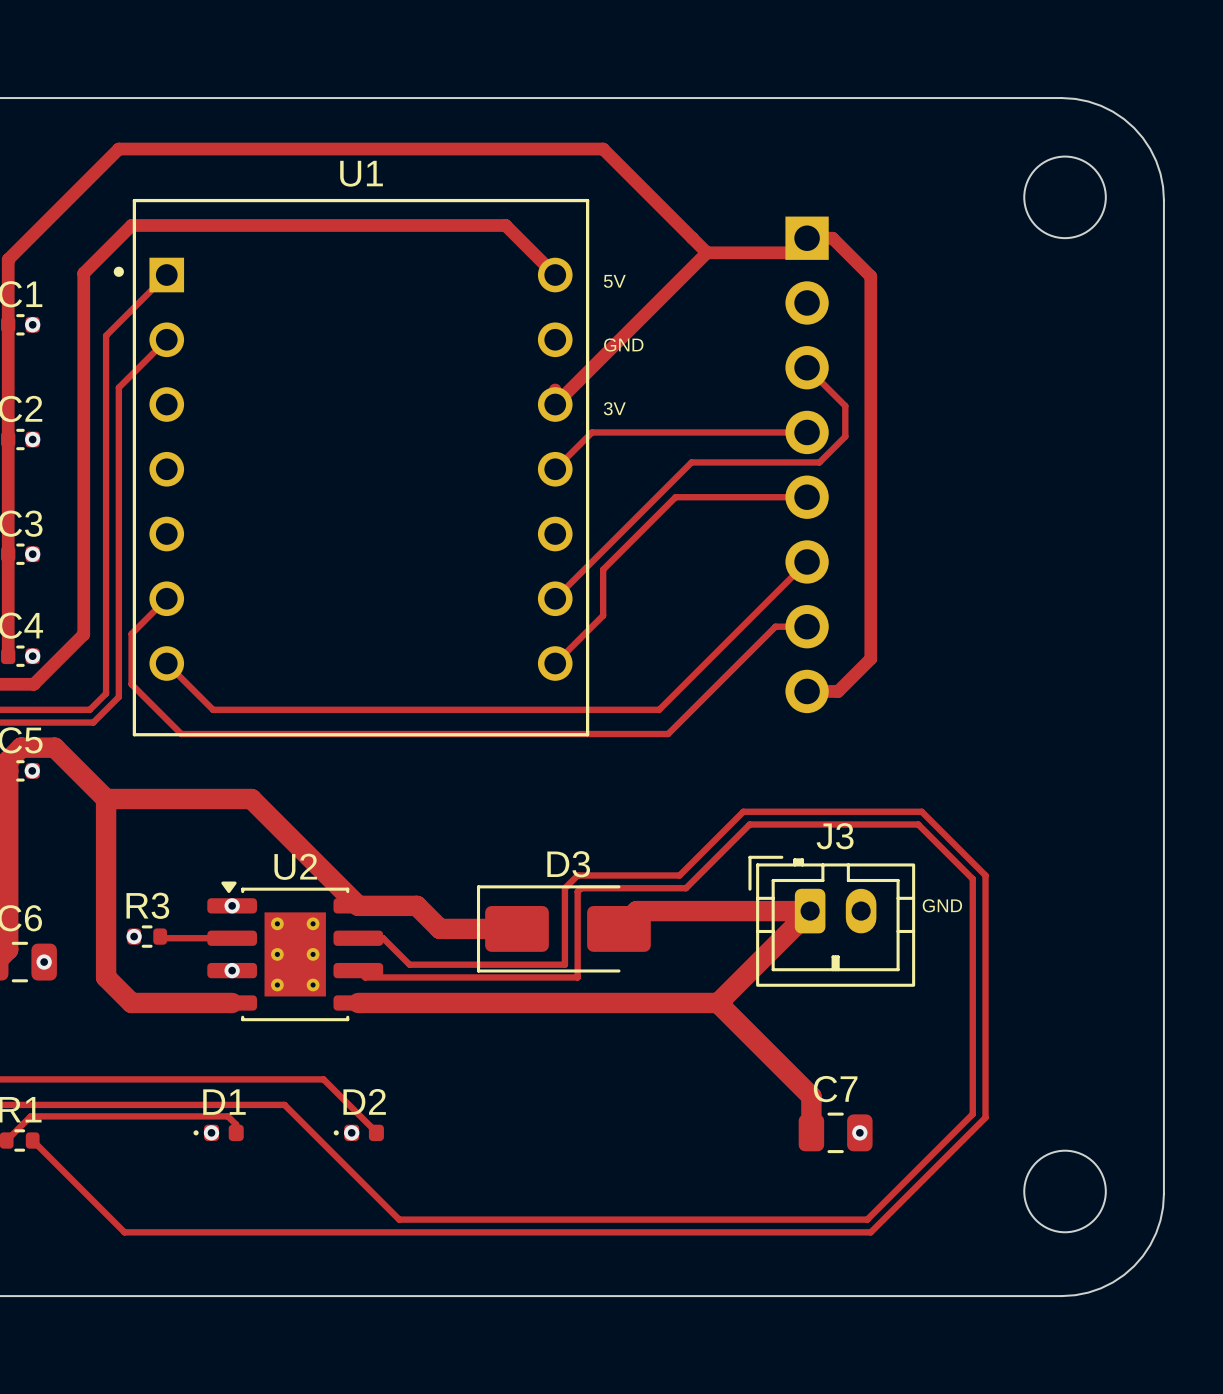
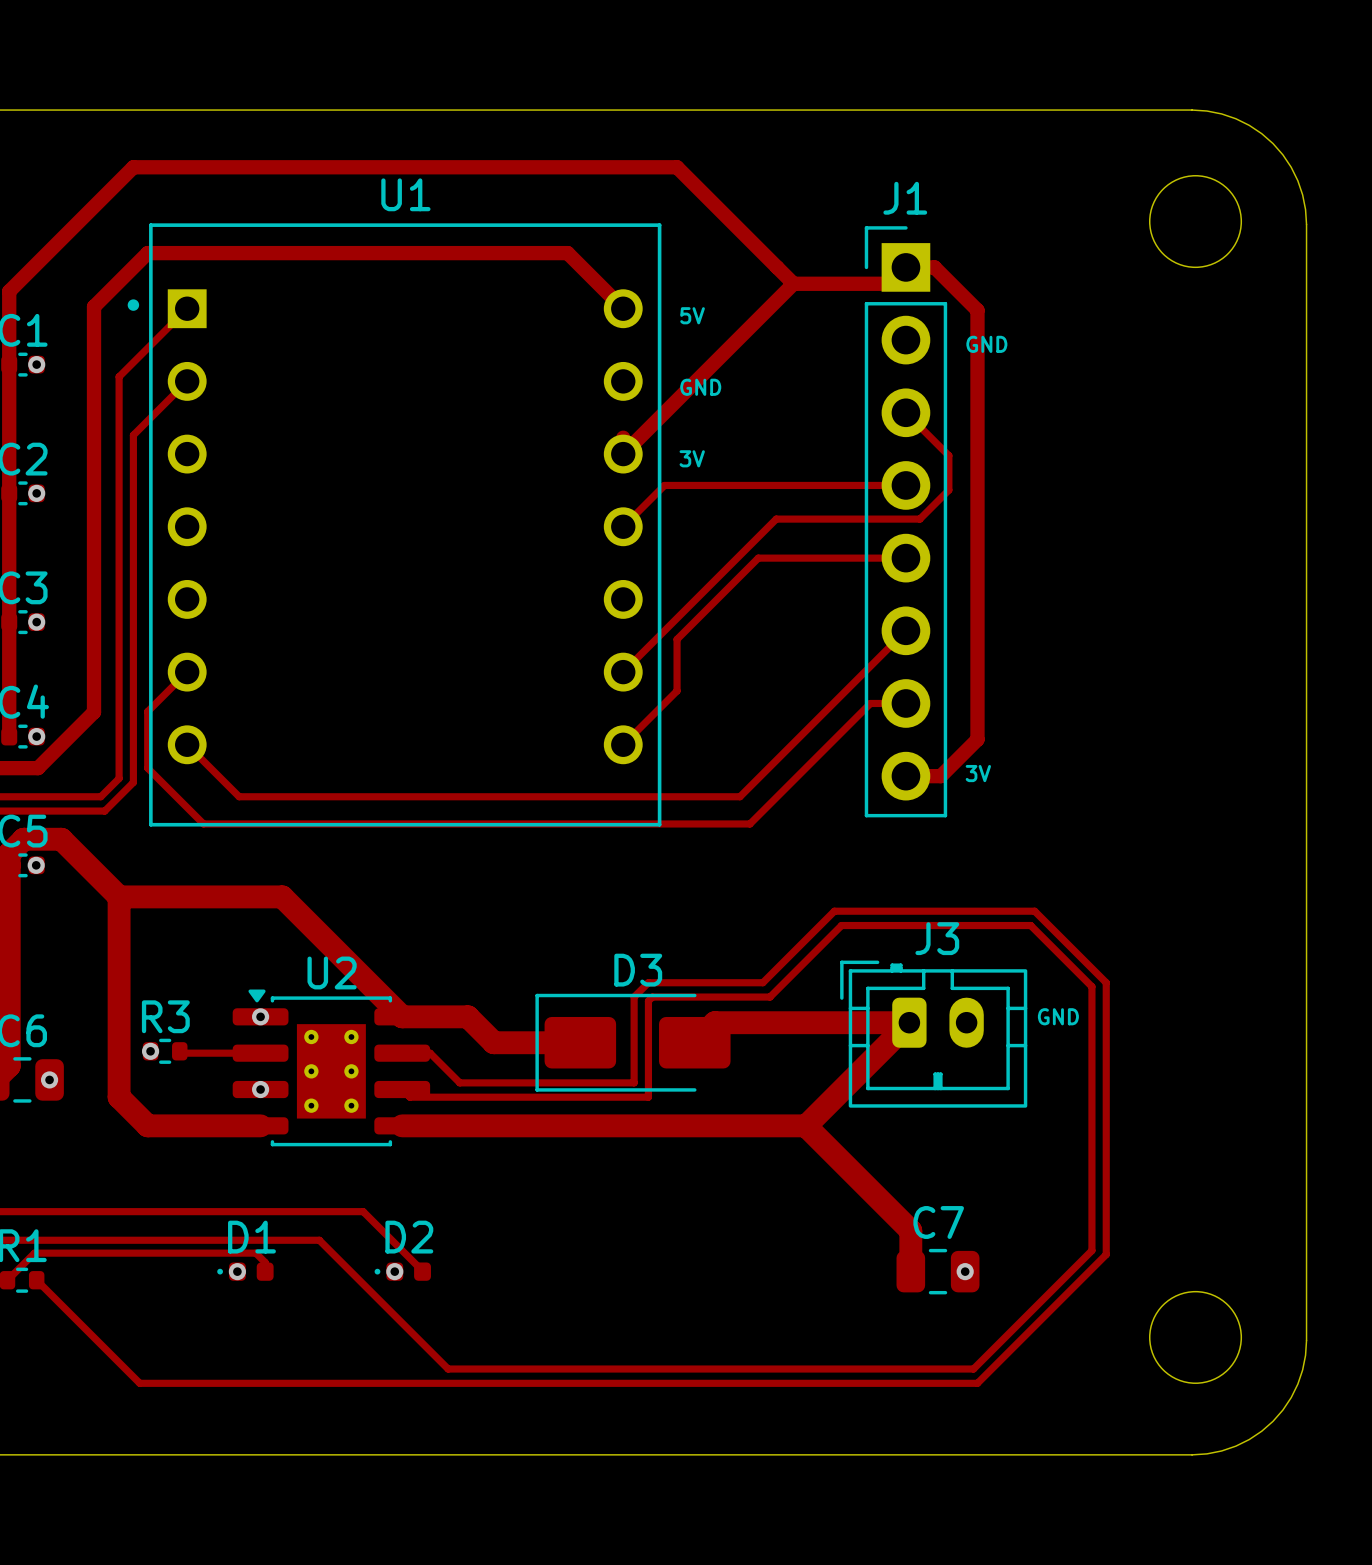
text: none -> GND (986, 344)
J1 side: bottom (807, 464) -> top (905, 521)
text: none -> 3V (978, 773)

